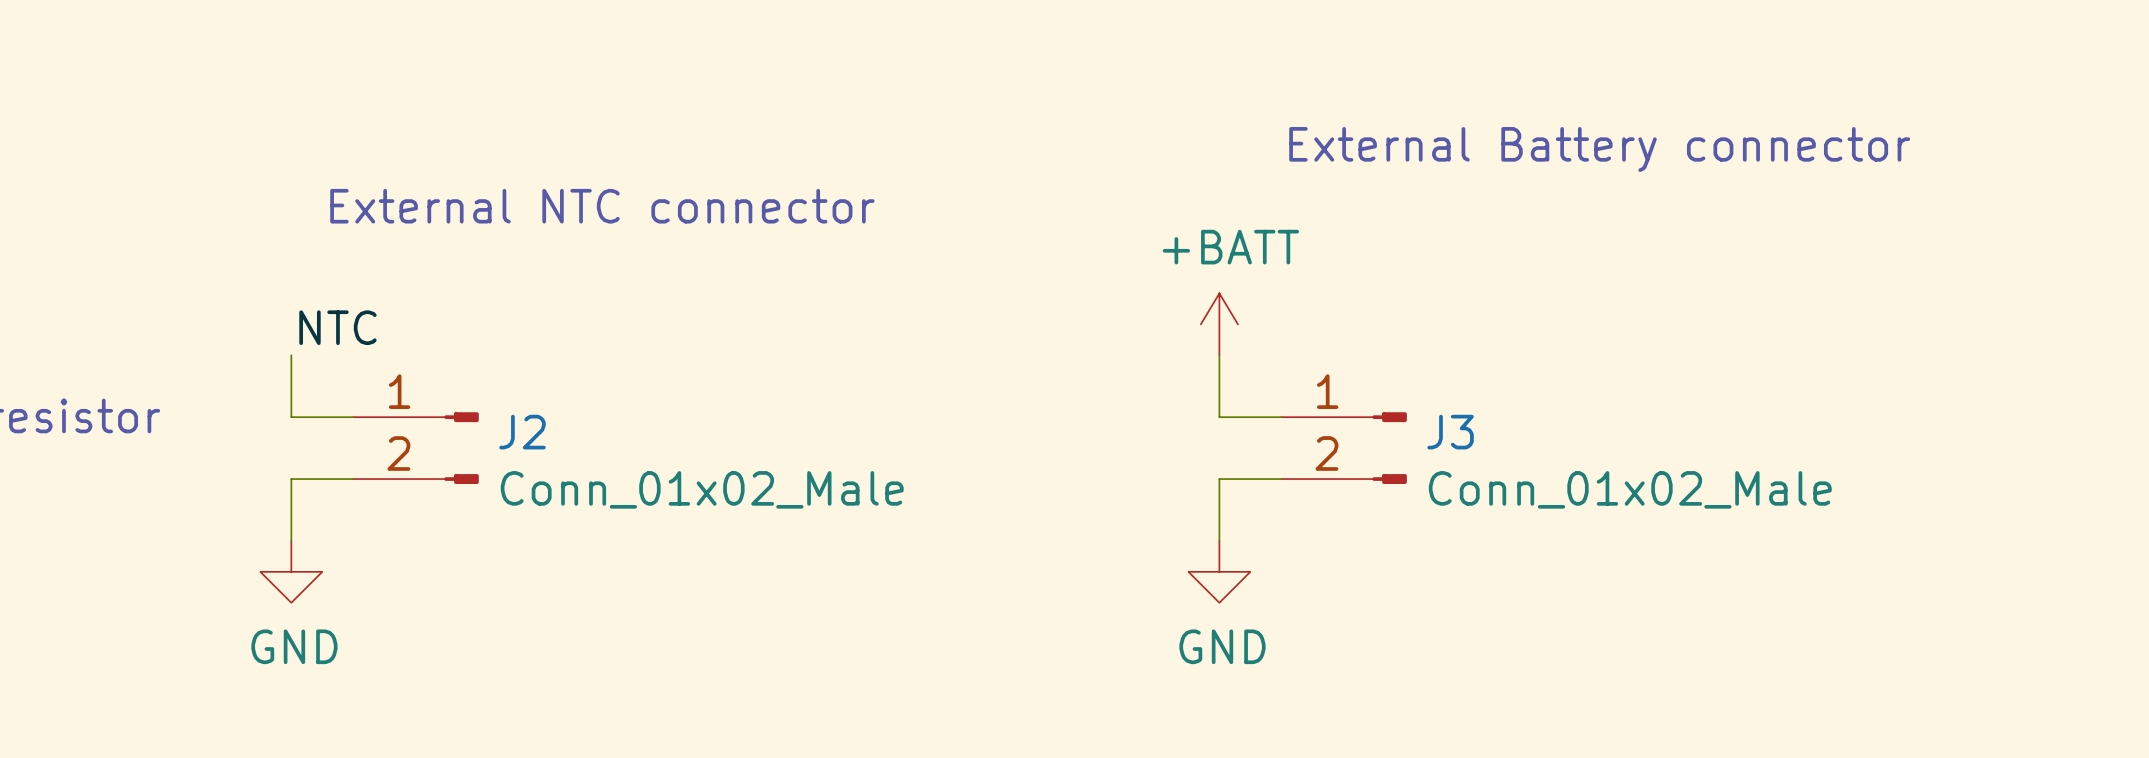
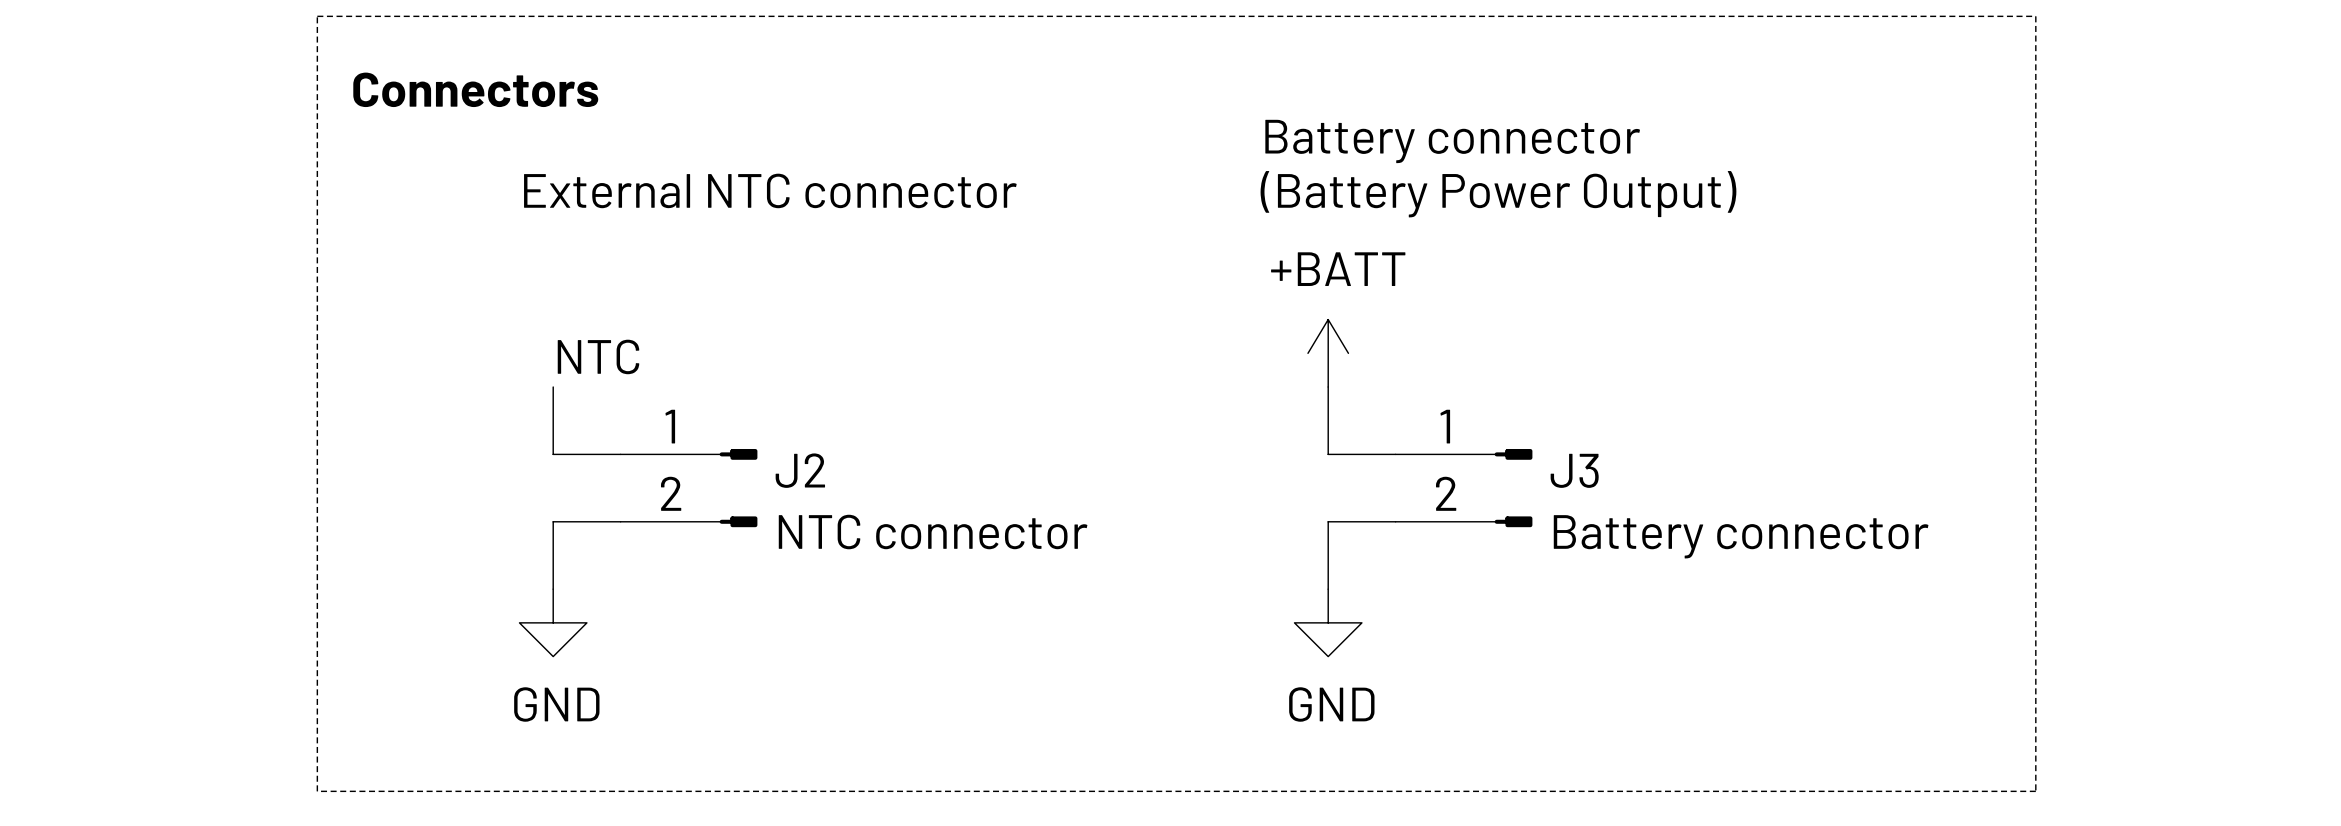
line: none -> (317, 16) (2035, 16) (2035, 791) (317, 791) (317, 16)
text: none -> Connectors (475, 89)
text: External Battery connector (1599, 149) -> Battery connector (1452, 141)
text: none -> (Battery Power Output) (1498, 194)
text position: External NTC connector (602, 206) -> External NTC connector (770, 190)
label position: NTC (337, 327) -> NTC (598, 356)
wire: (291, 355) (291, 417) (353, 417) -> (553, 387) (553, 454) (620, 454)
J2 position: (416, 448) -> (689, 488)
wire: (353, 479) (291, 479) (291, 540) -> (620, 521) (553, 521) (553, 589)
J2 value: Conn_01x02_Male (702, 489) -> NTC connector (933, 532)
J3 value: Conn_01x02_Male (1630, 489) -> Battery connector (1741, 536)
power symbol position: GND (291, 571) -> GND (553, 622)

